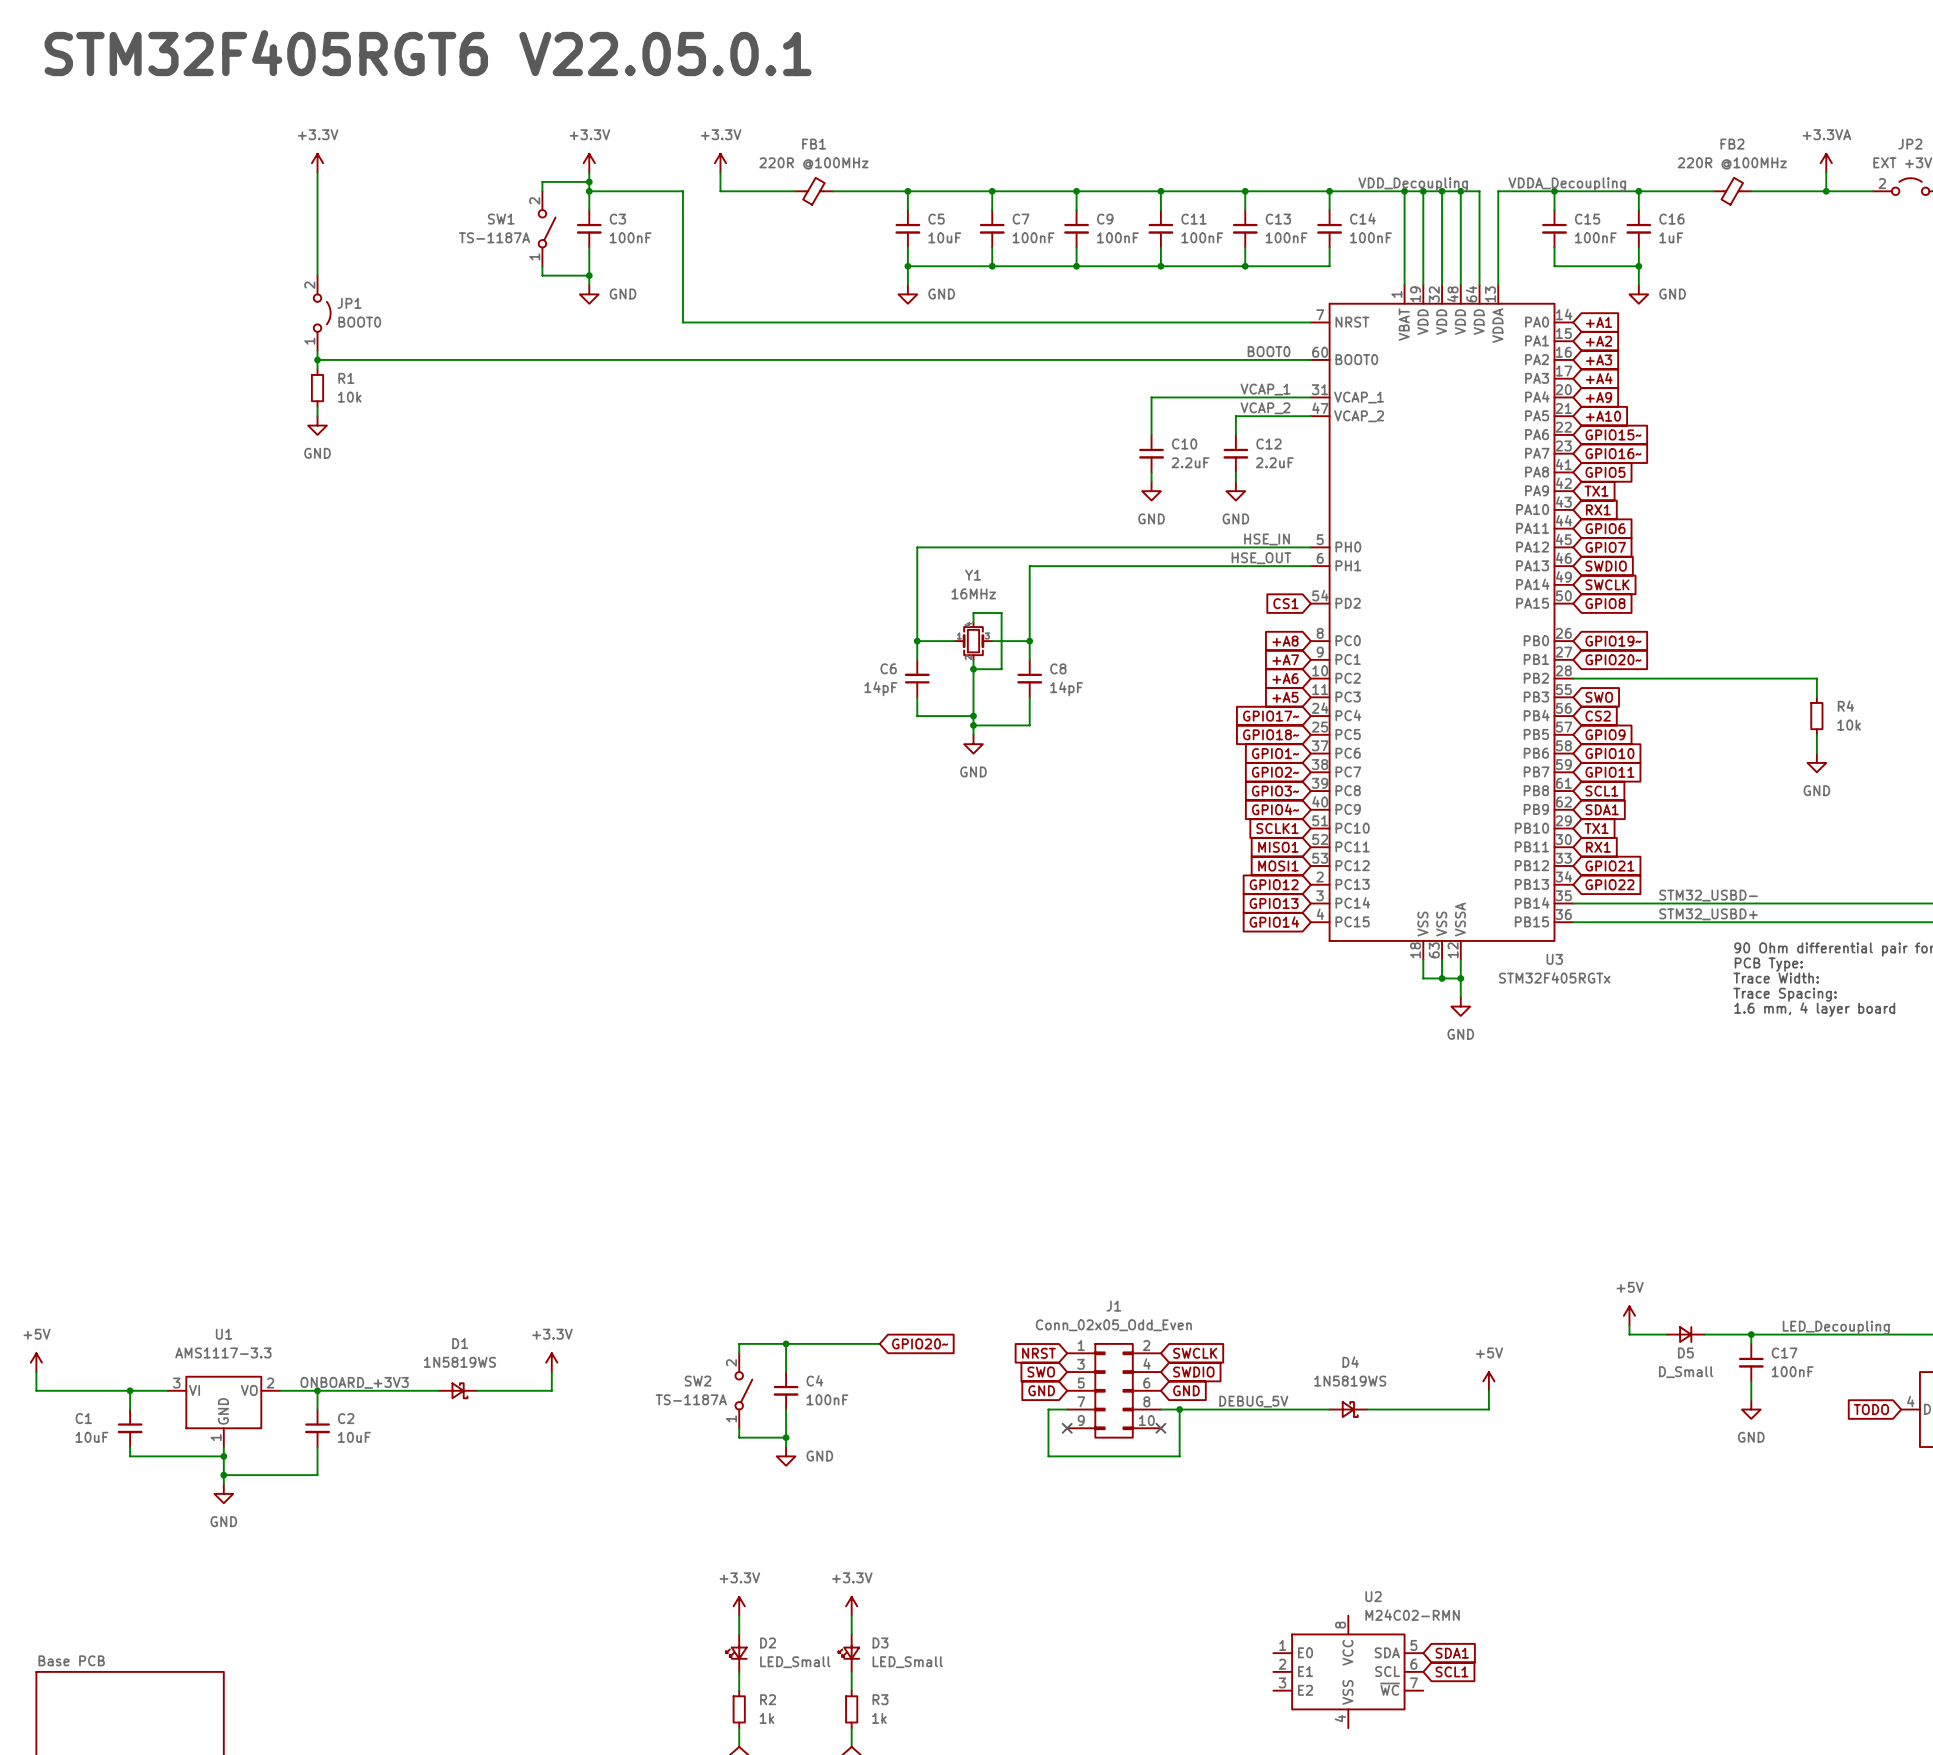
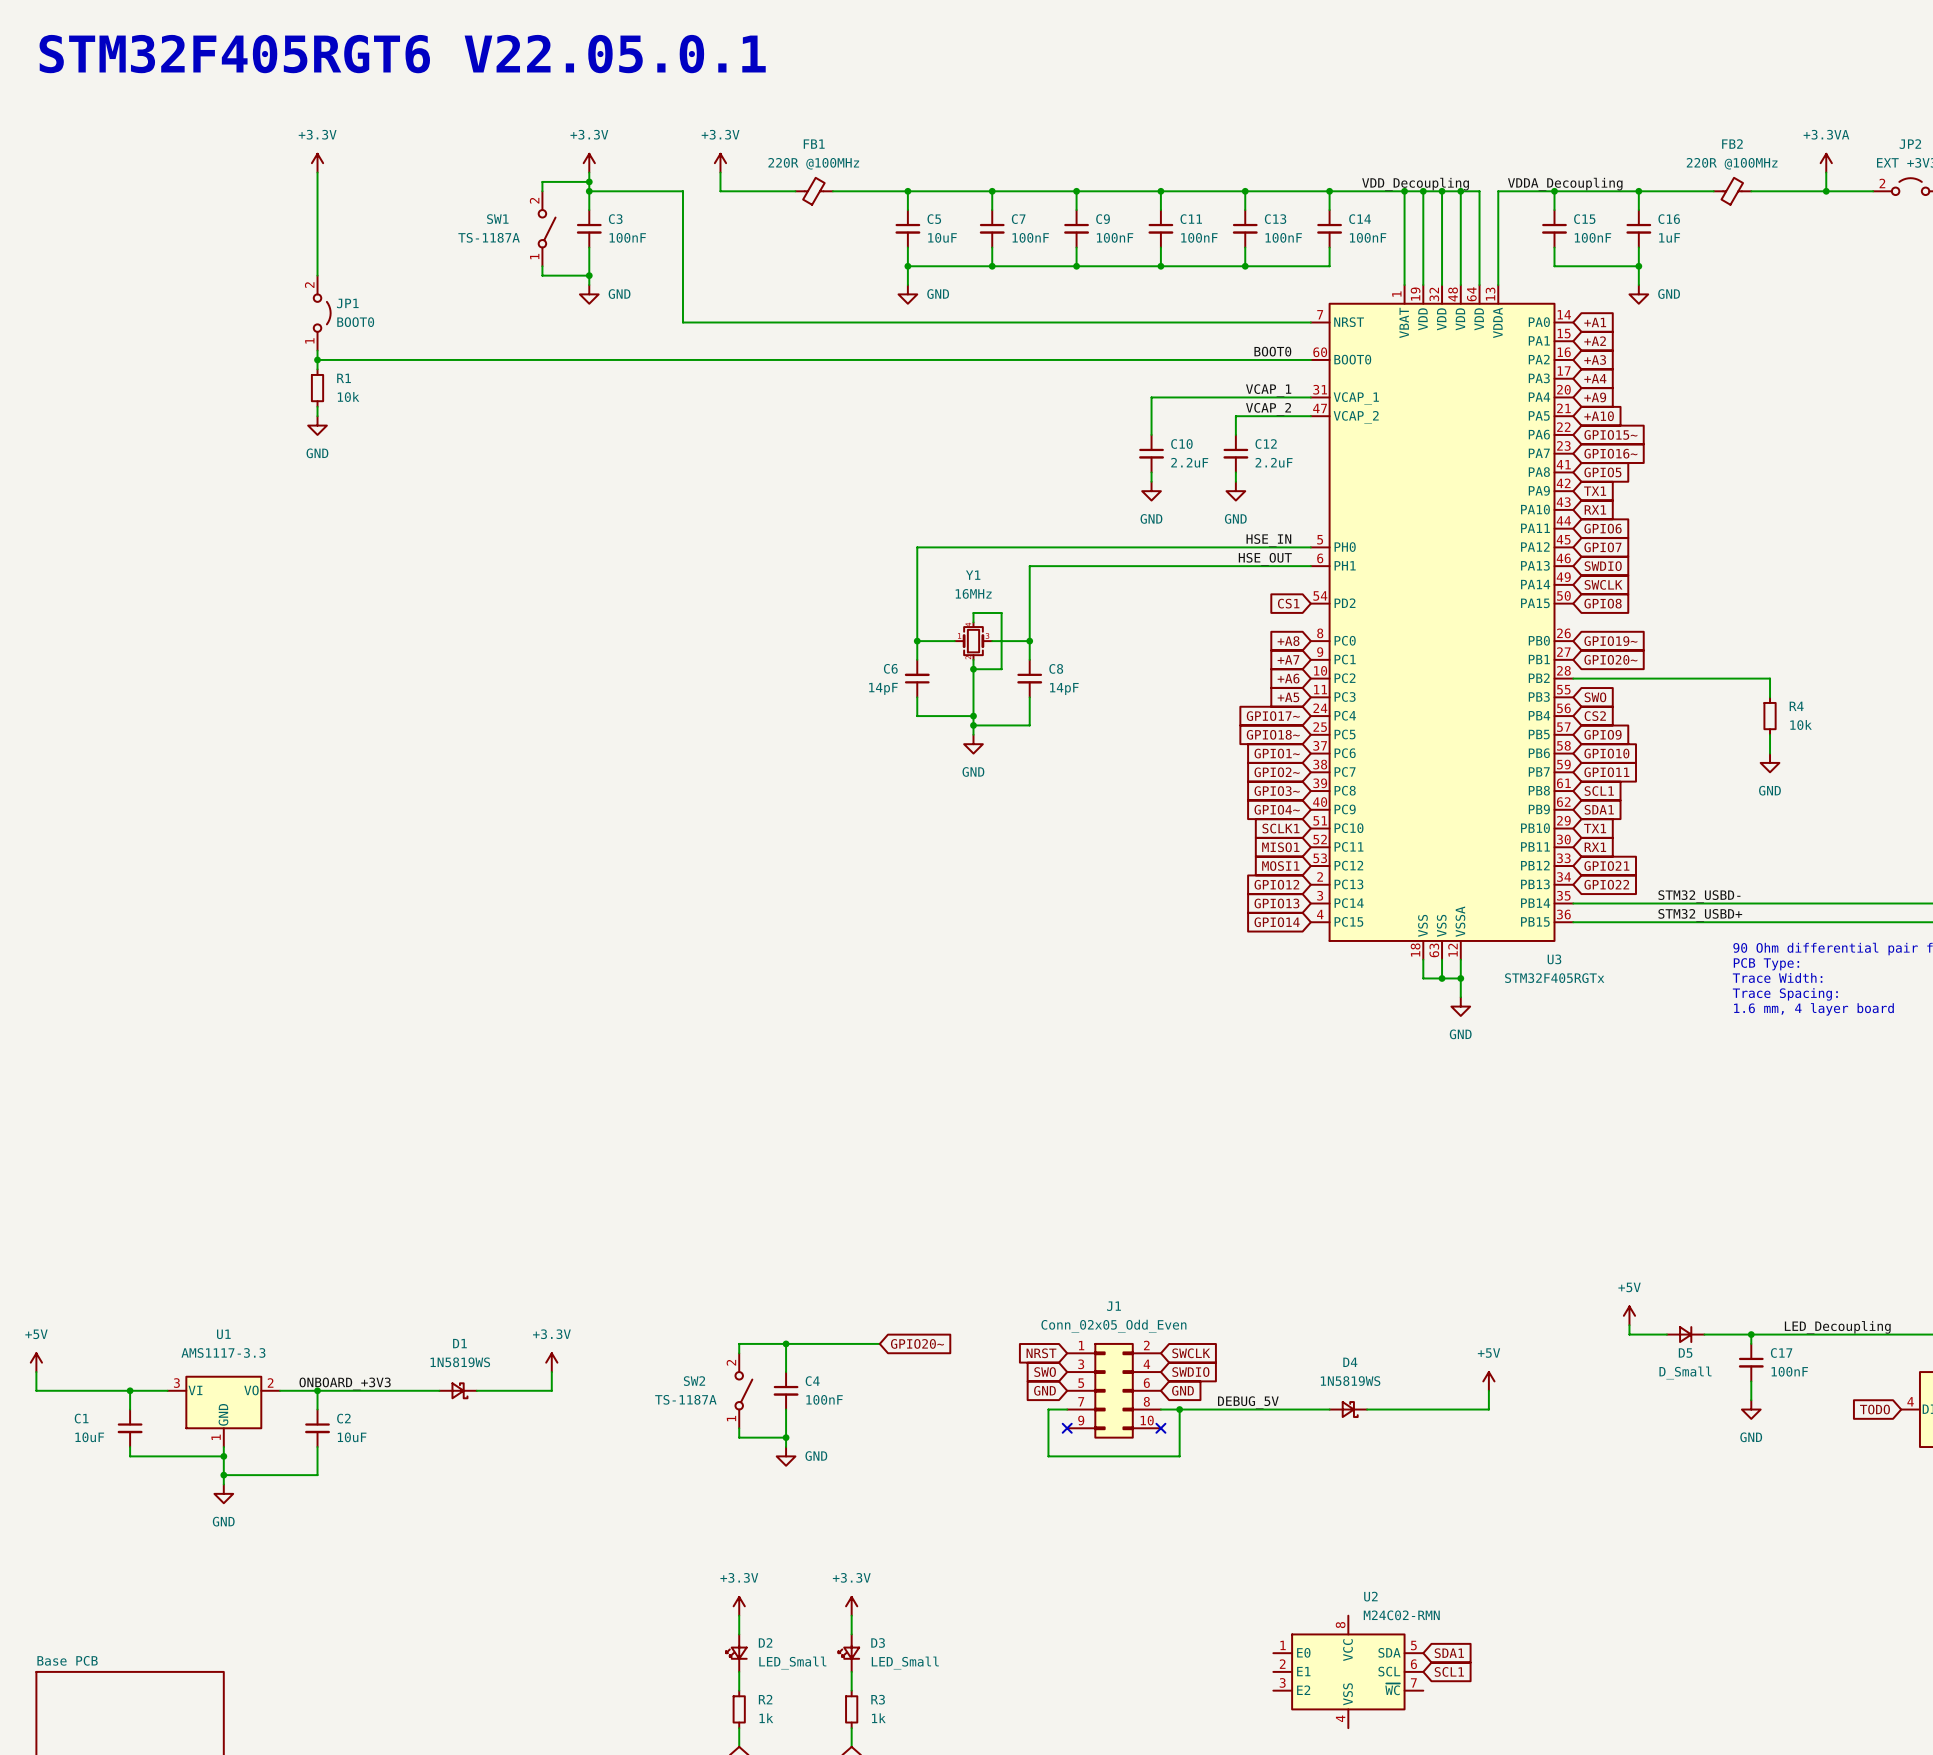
wire: (1770, 678) (1816, 678) (1816, 697) -> (1770, 678) (1770, 697)
R4 position: (1816, 716) -> (1770, 716)
wire: (1816, 734) (1816, 753) -> (1770, 734) (1770, 753)
power symbol position: GND (1816, 762) -> GND (1770, 762)

